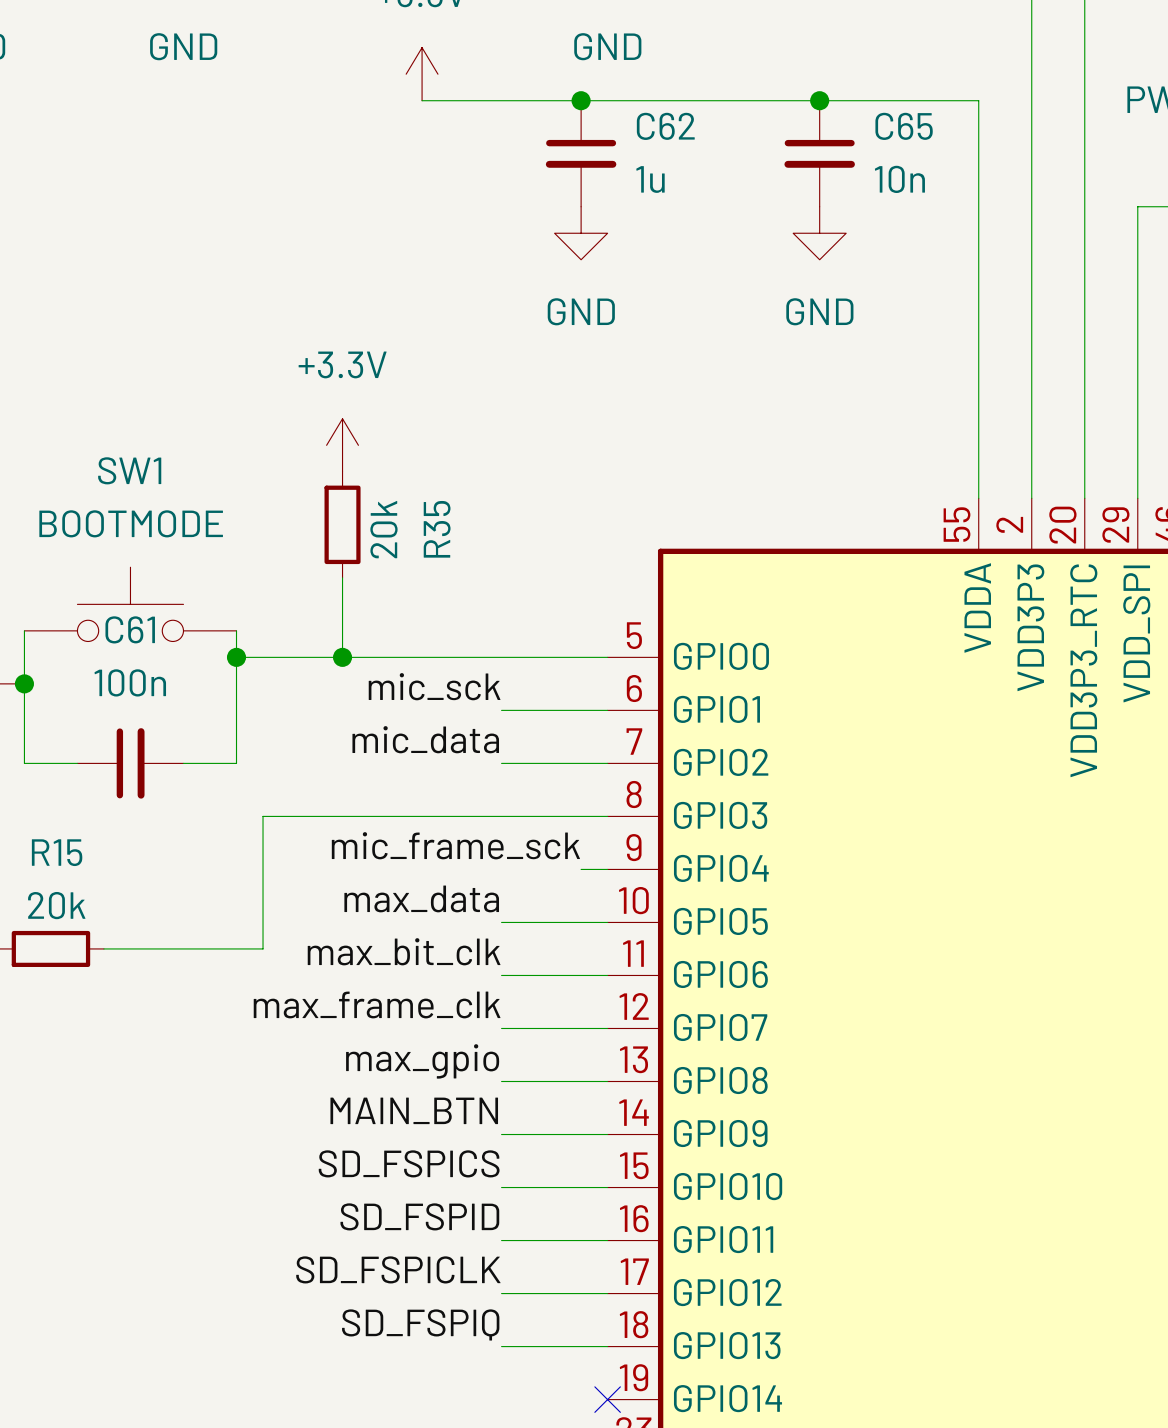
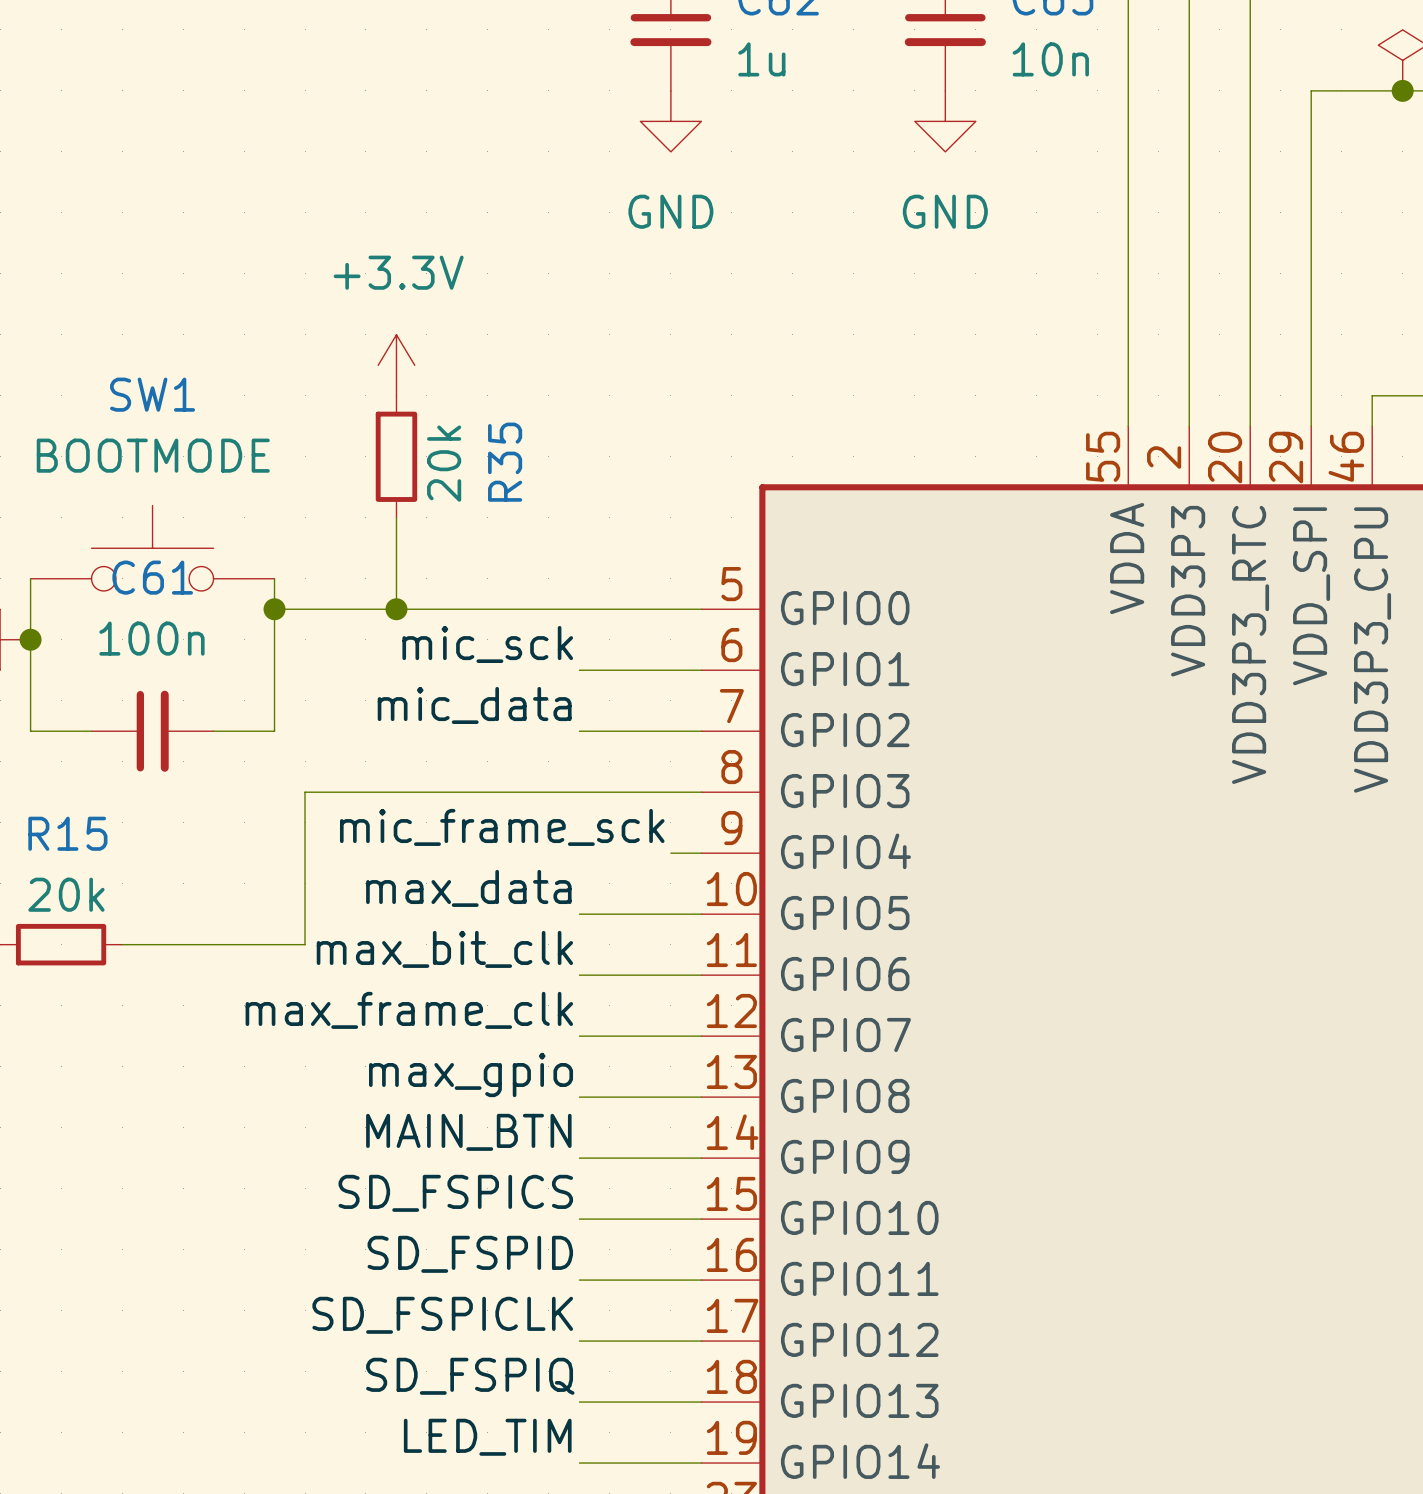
label: none -> LED_TIM (487, 1437)
wire: none -> (579, 1463) (701, 1463)
no-connect mark: (607, 1399) -> none

